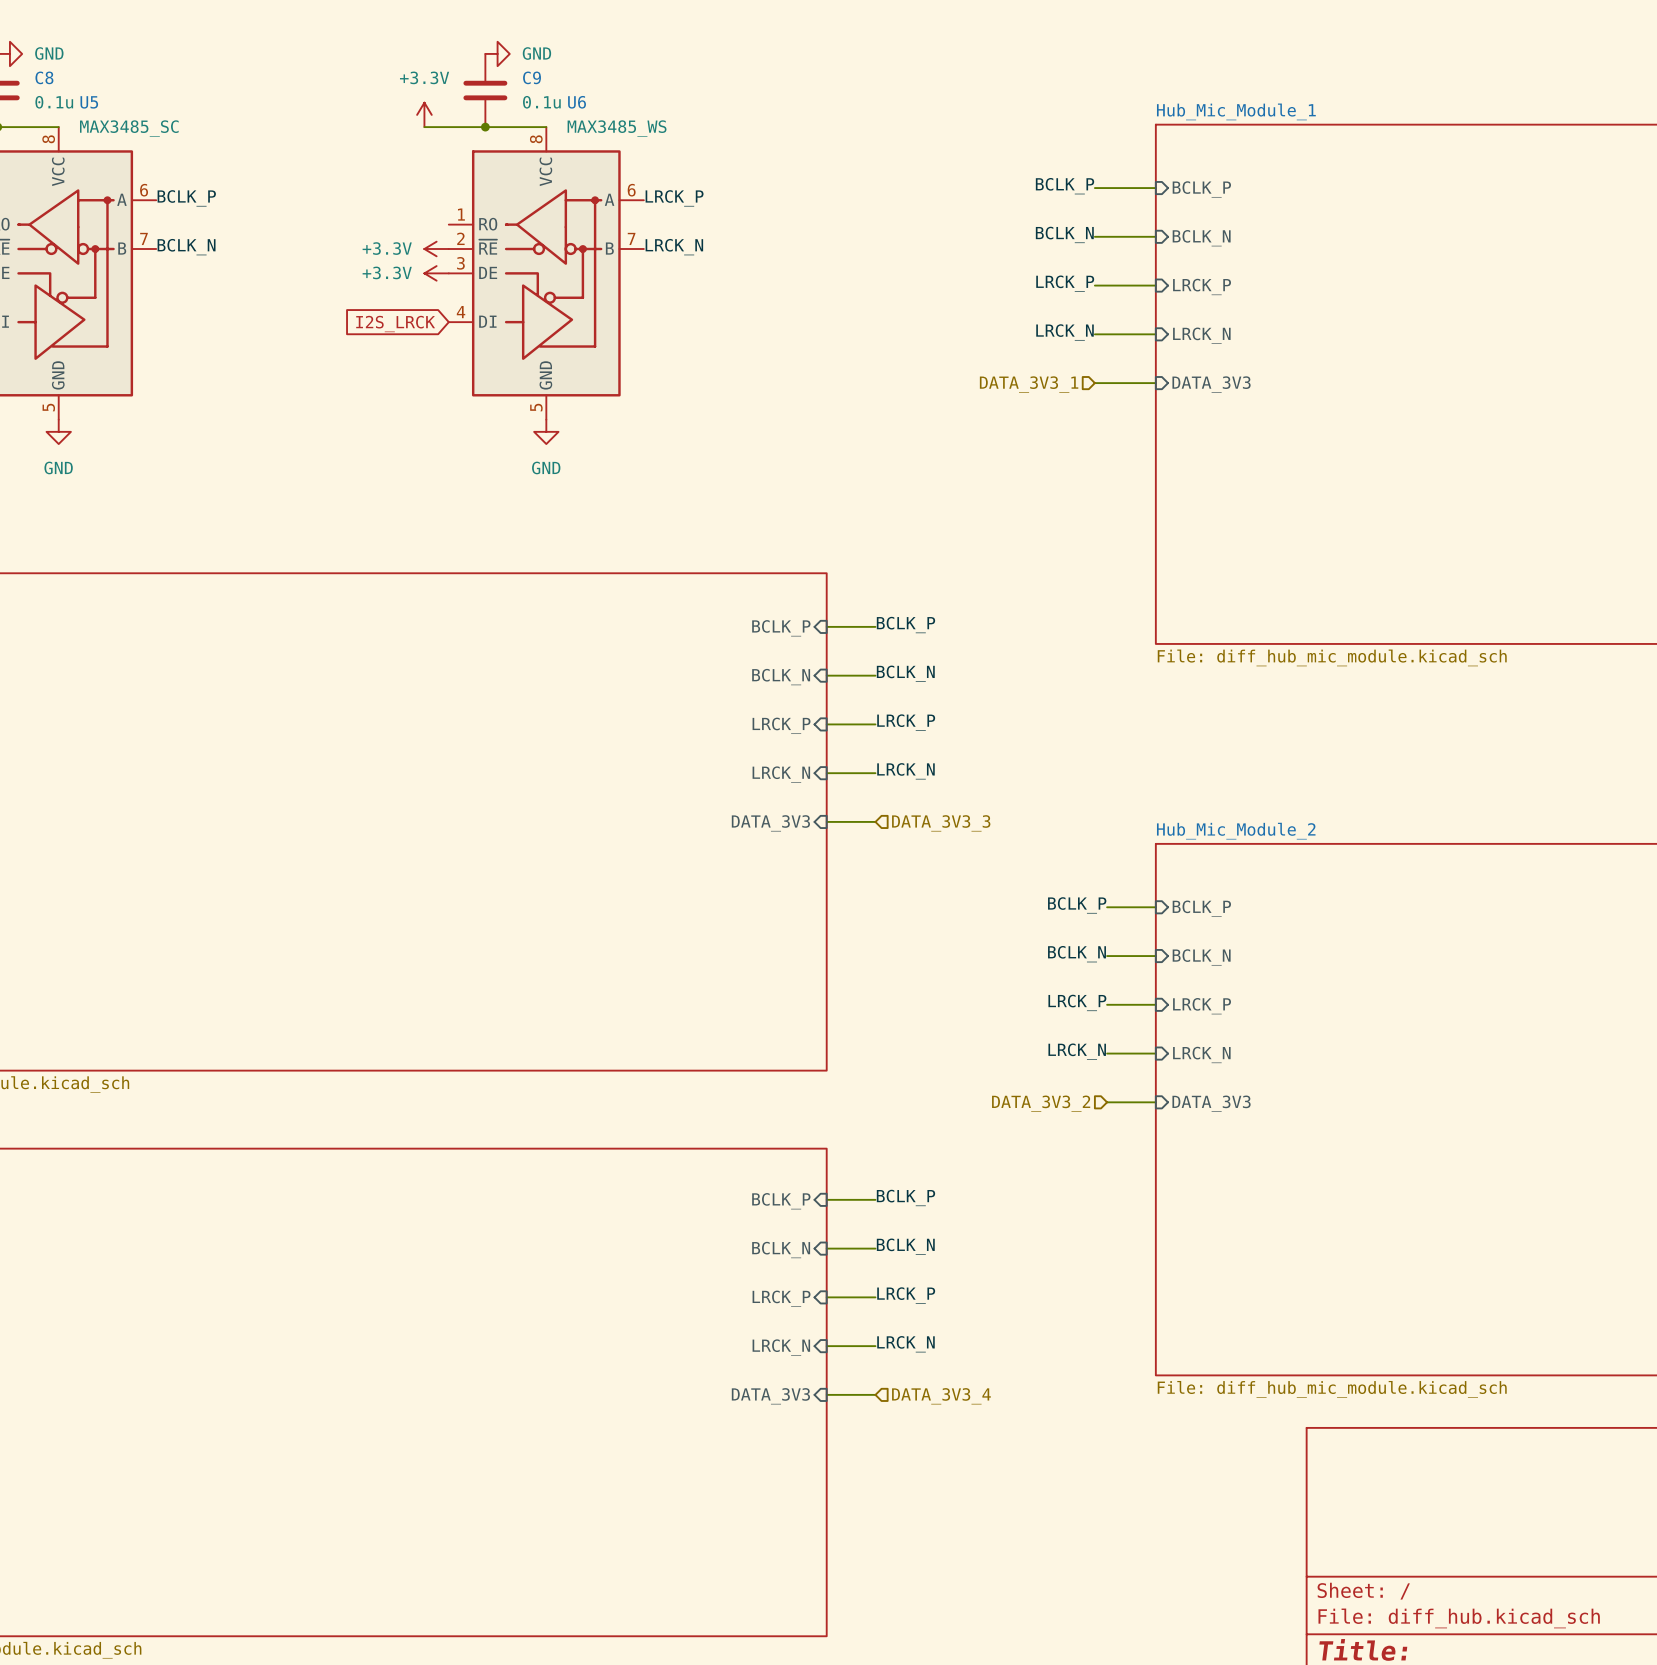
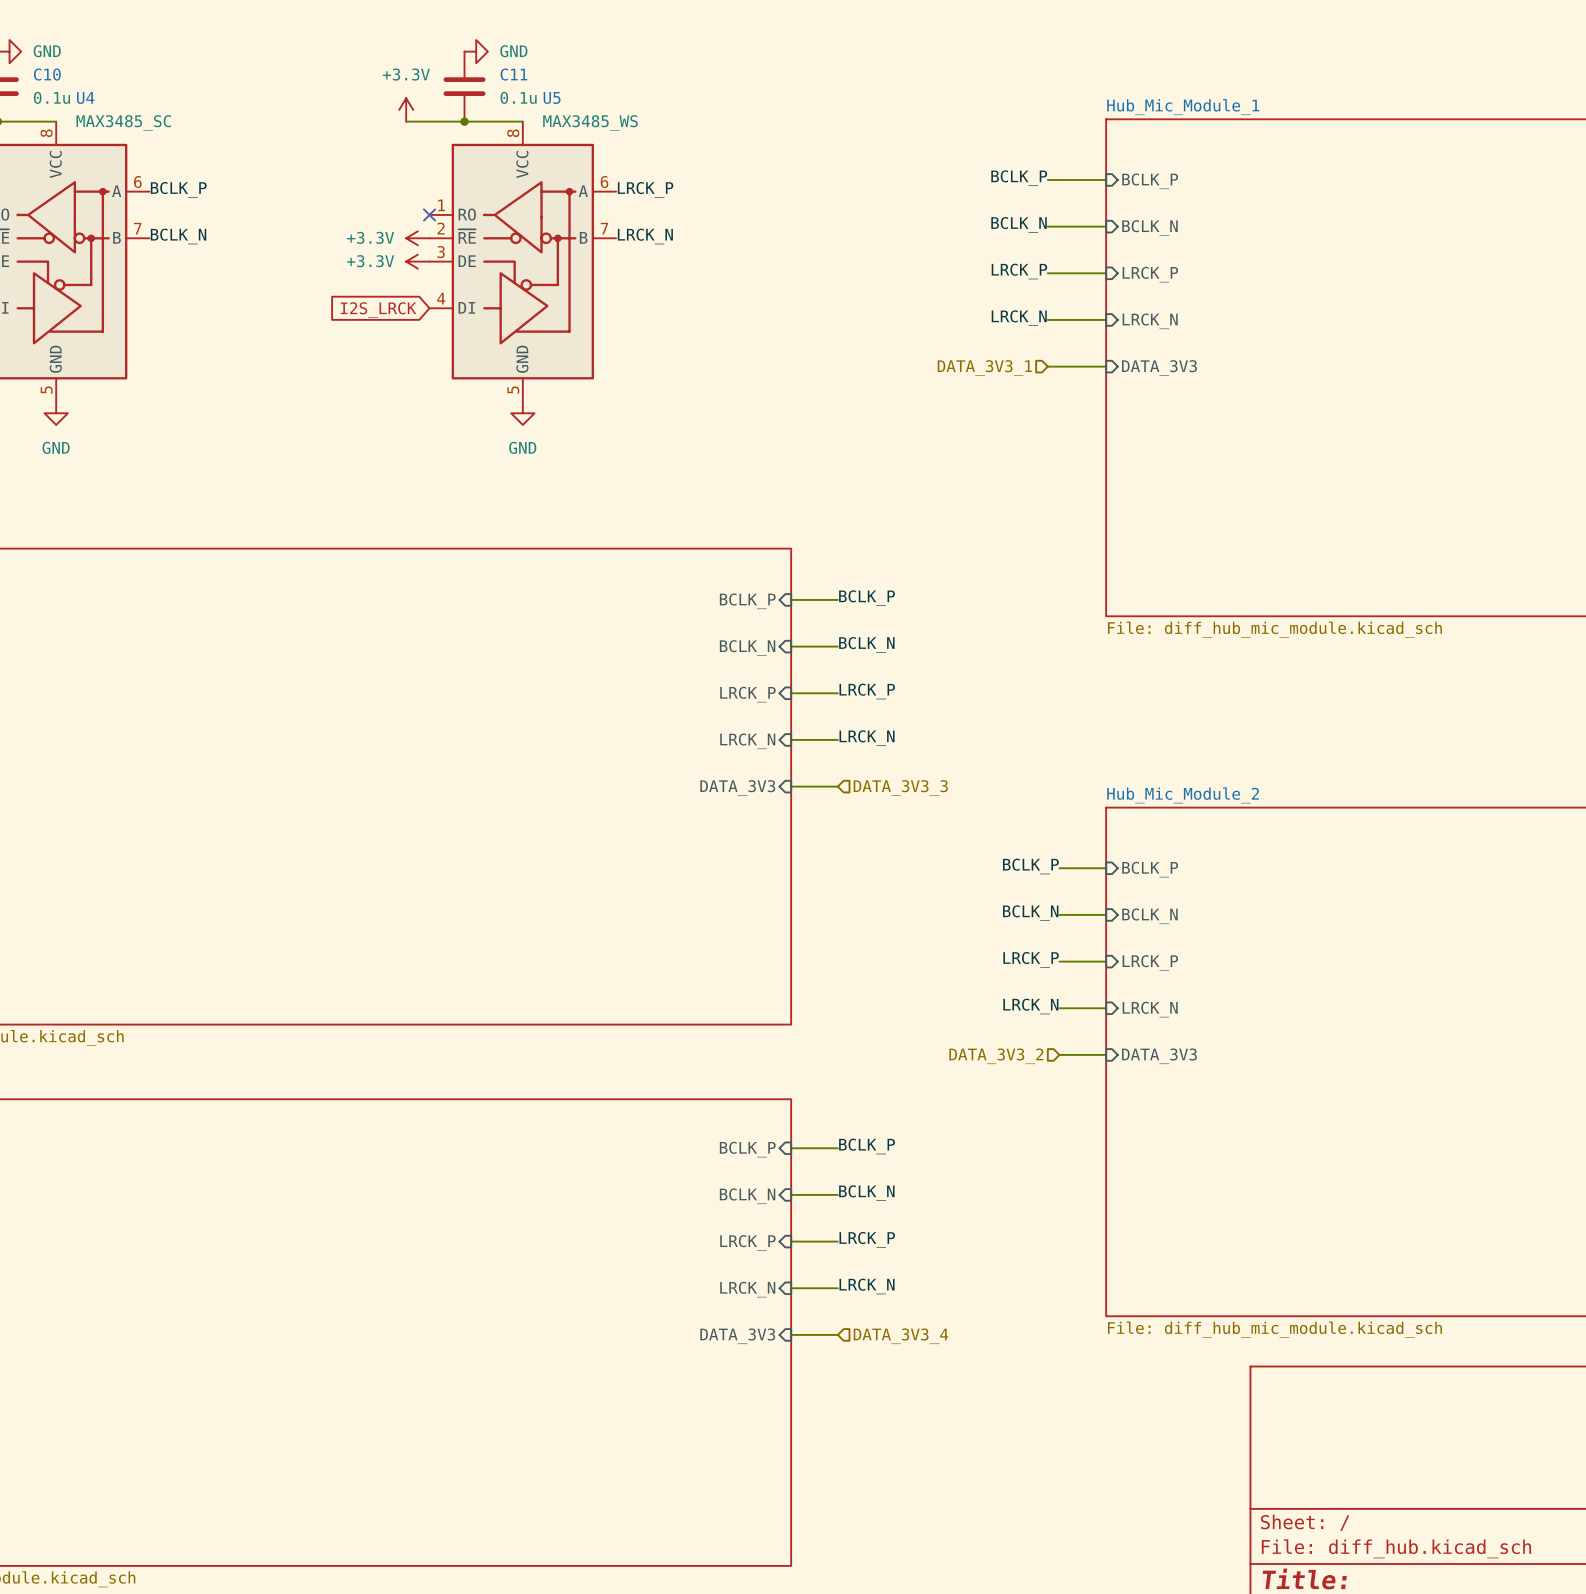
C8 name: C8 (44, 77) -> C10 (47, 74)
C9 name: C9 (532, 77) -> C11 (513, 74)
U5 name: U5 (89, 102) -> U4 (85, 97)
U6 name: U6 (577, 102) -> U5 (552, 97)
no-connect mark: none -> (429, 214)

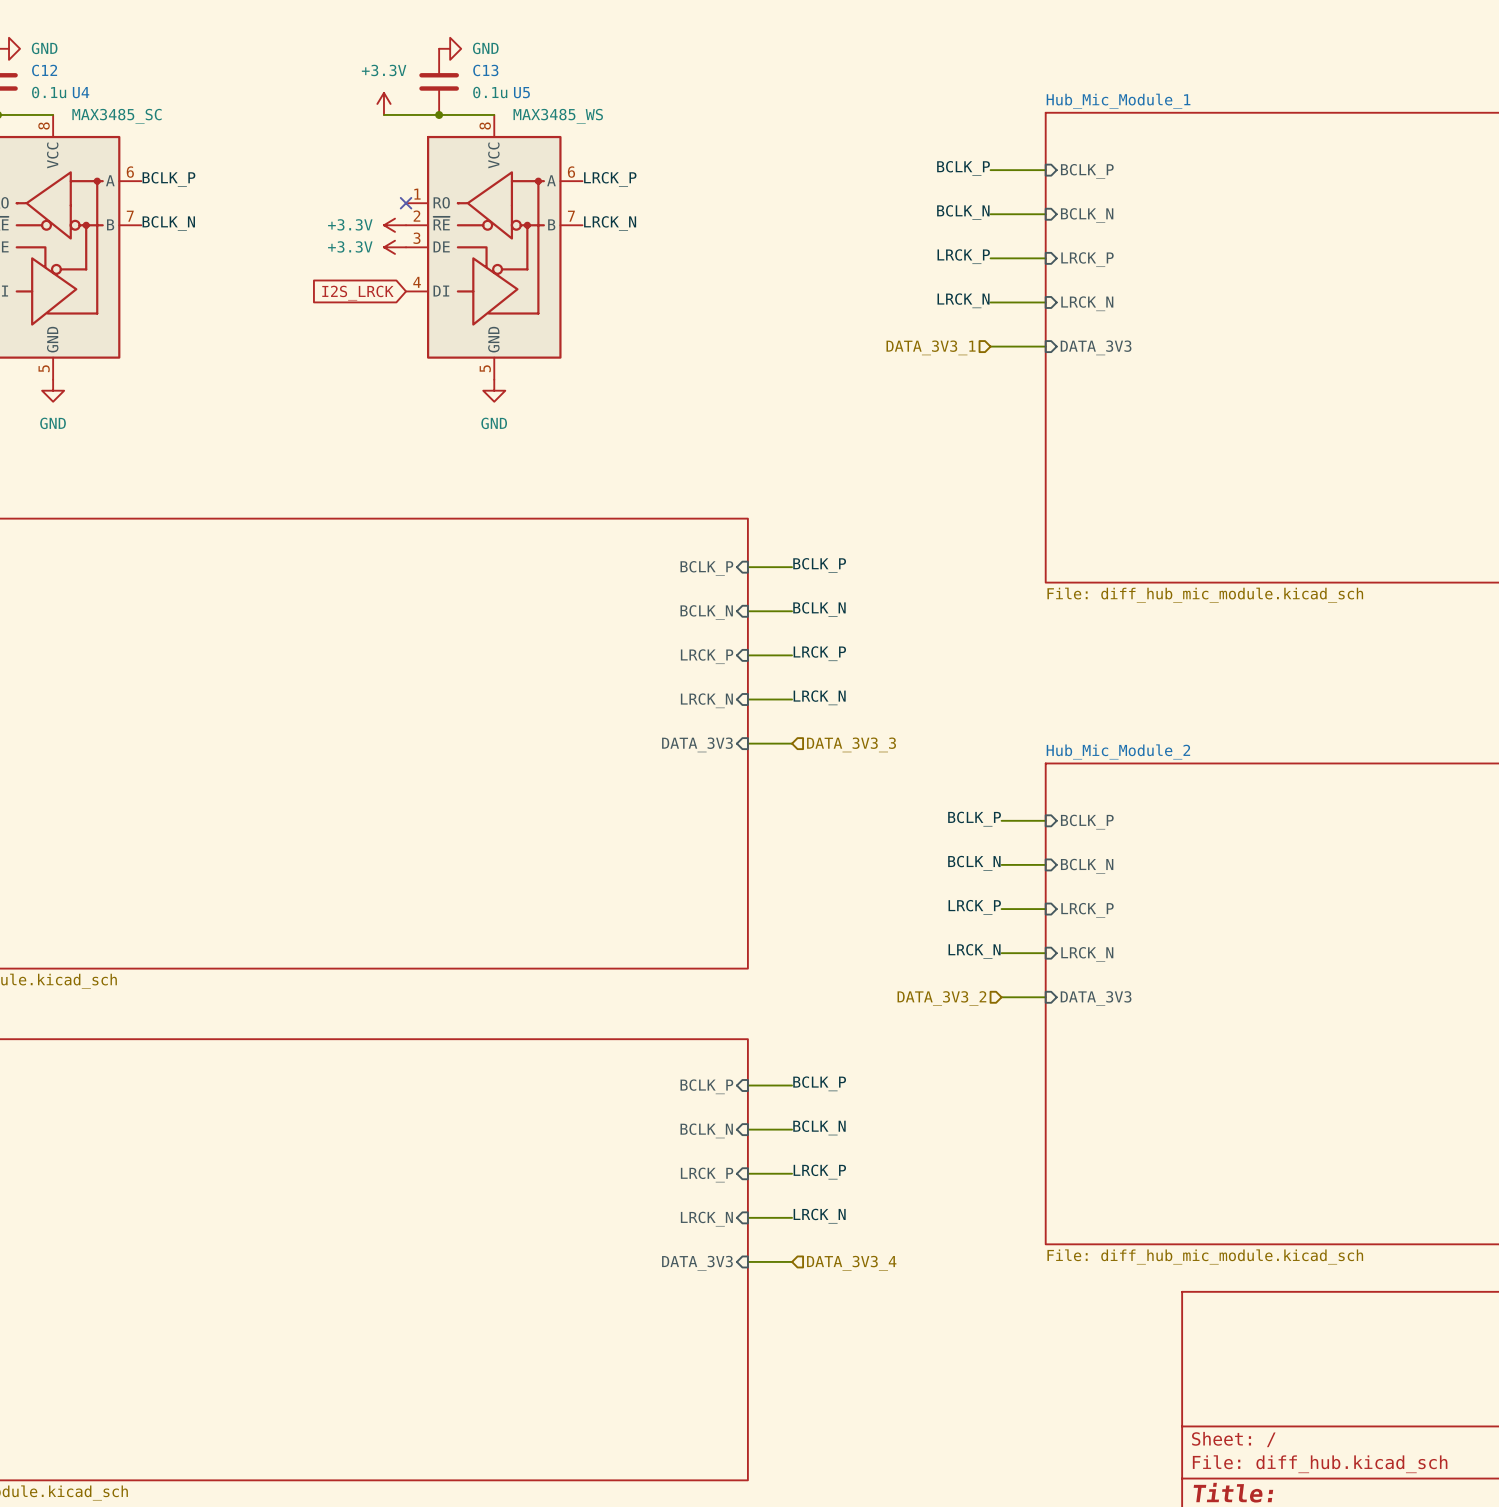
C10 name: C10 (47, 74) -> C12 (44, 70)
C11 name: C11 (513, 74) -> C13 (485, 70)

